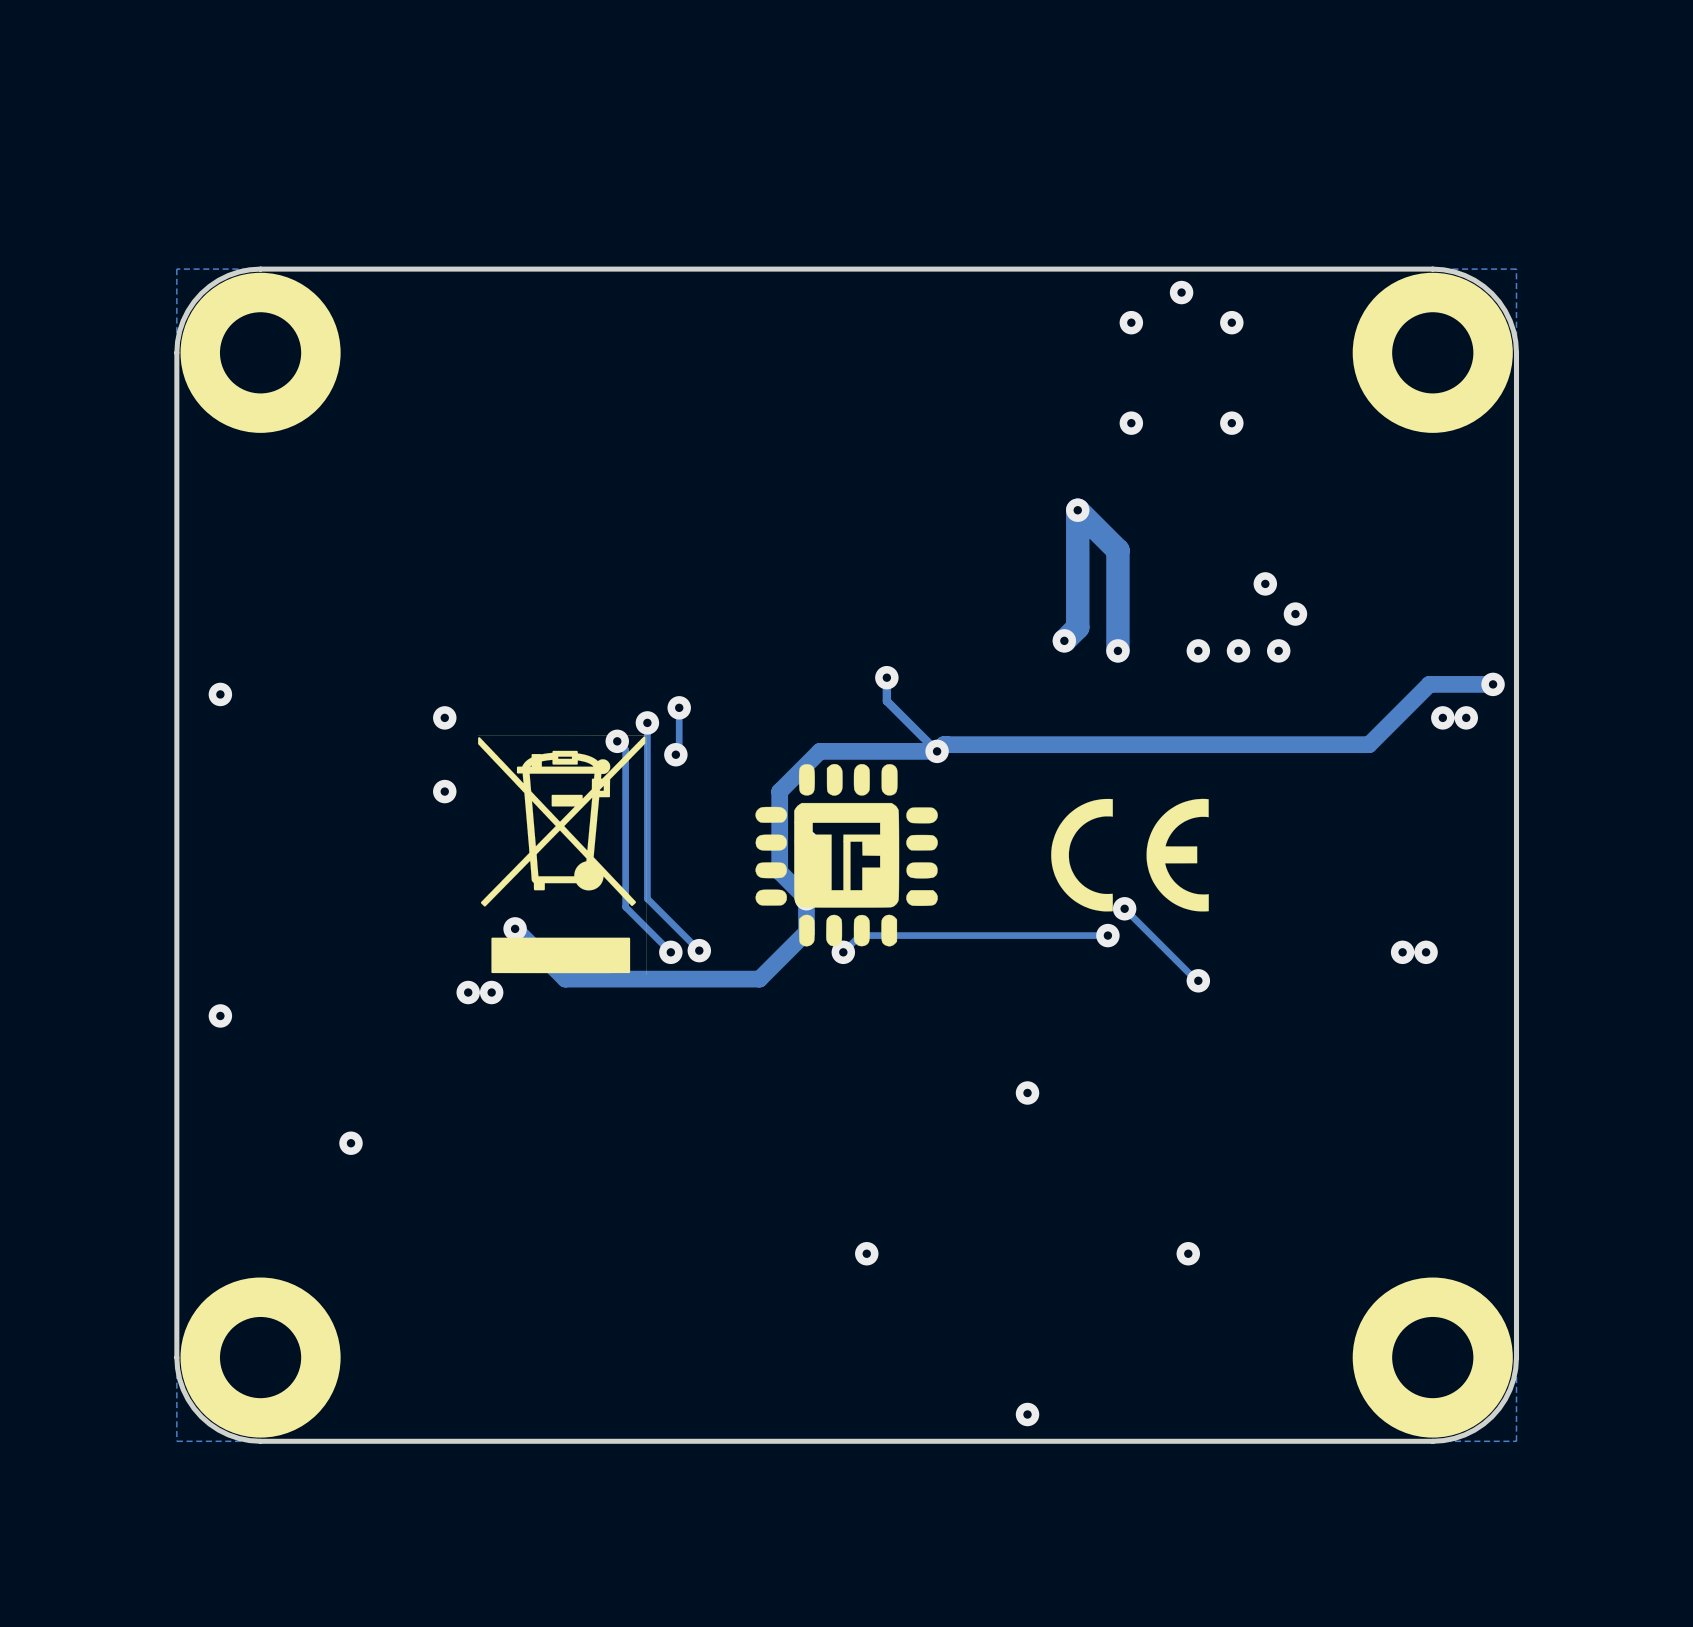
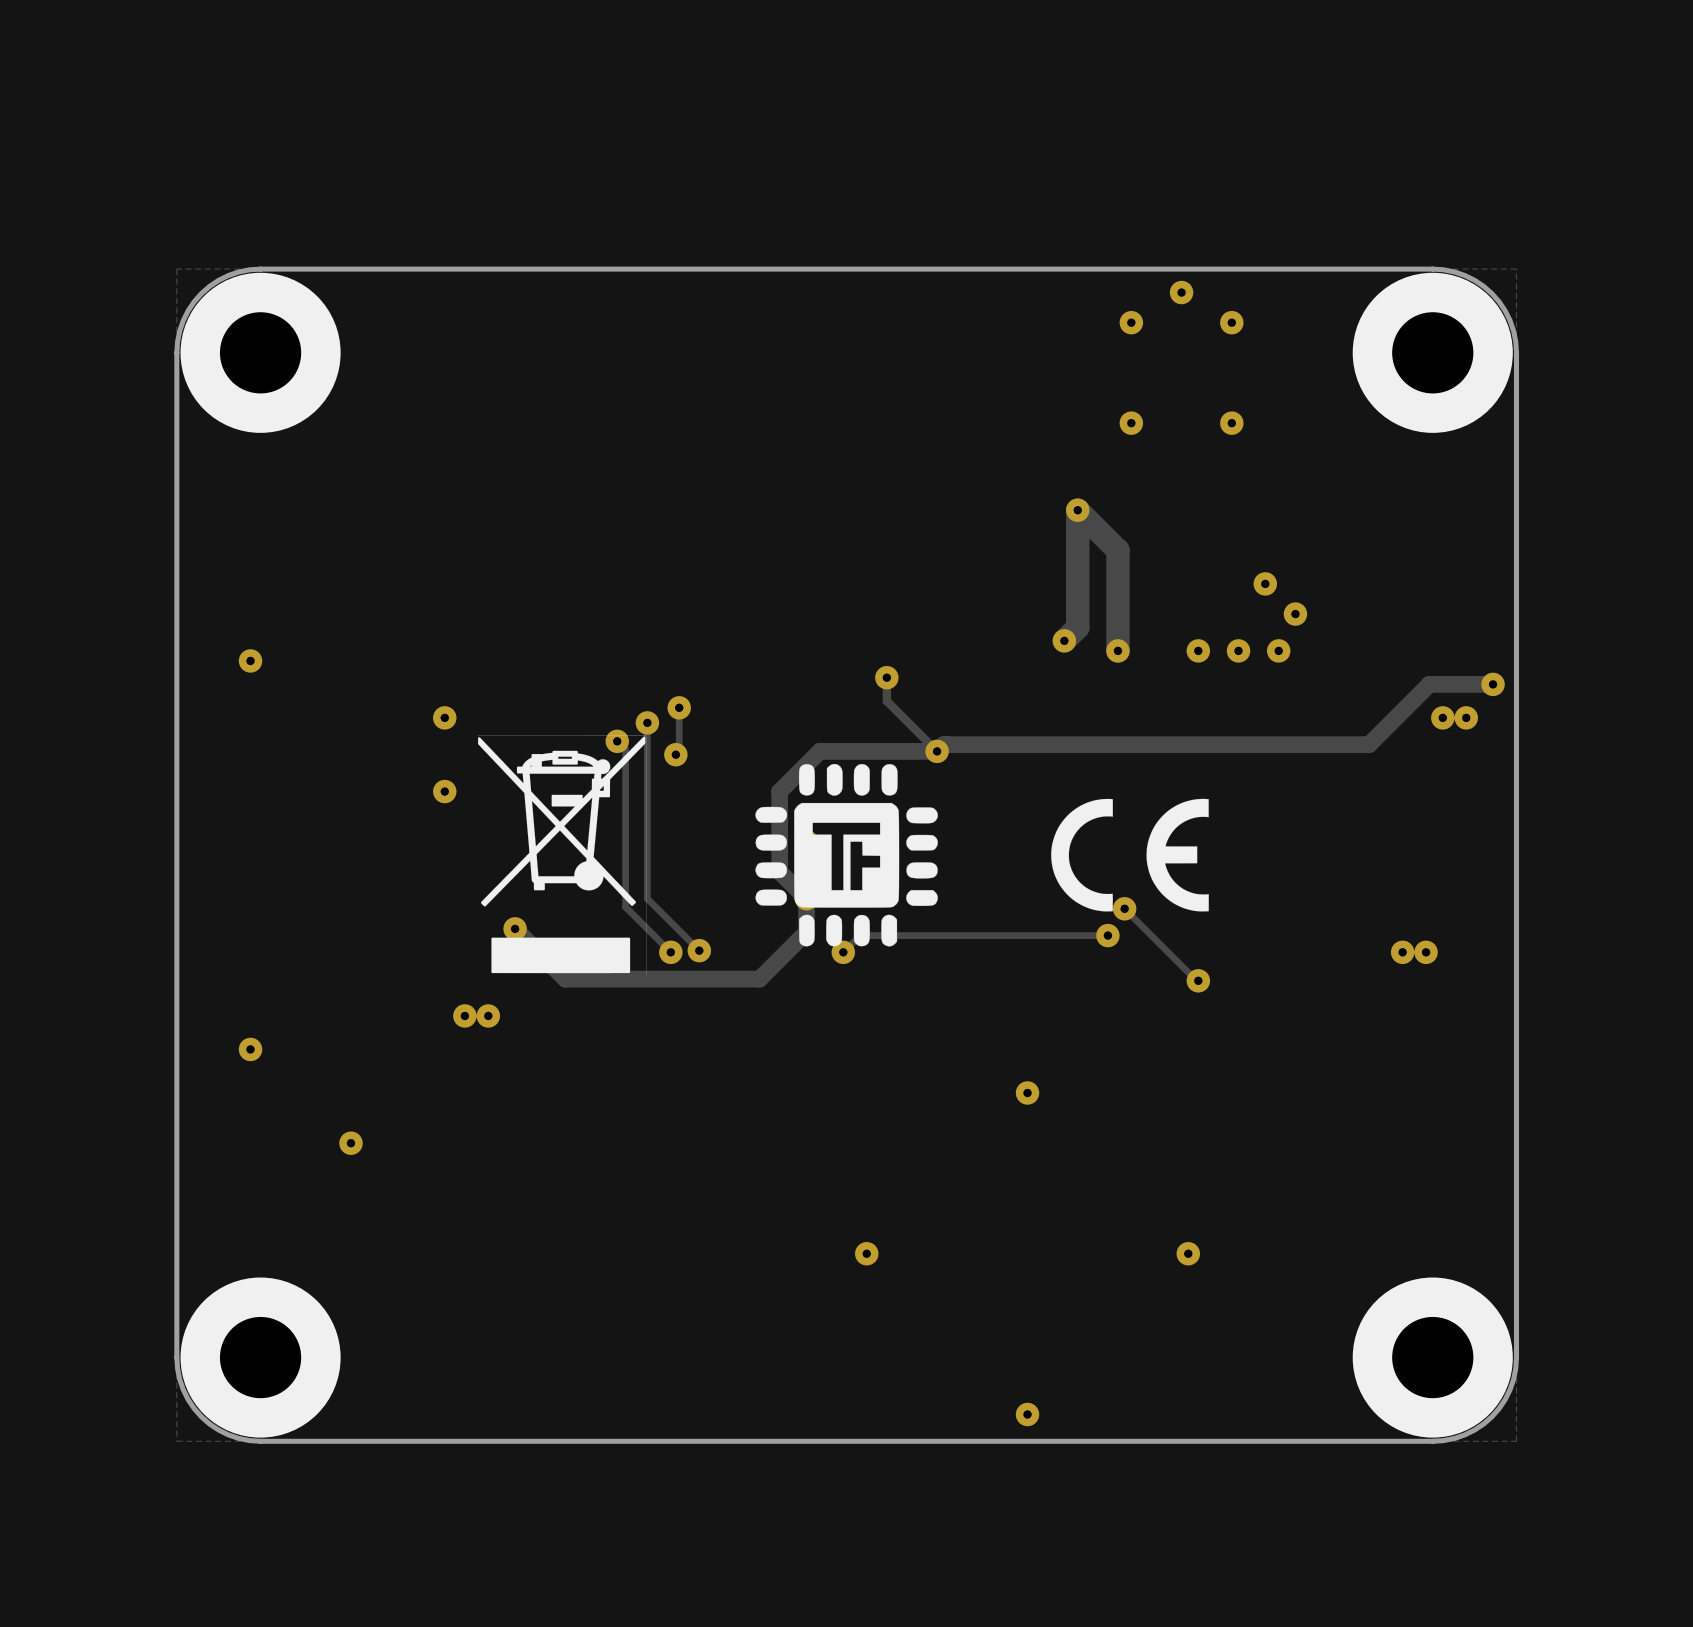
via position: (220, 694) -> (250, 660)
via: (468, 992) -> none
via: (491, 992) -> none
via position: (220, 1015) -> (250, 1049)
via: none -> (464, 1015)
via: none -> (488, 1015)

